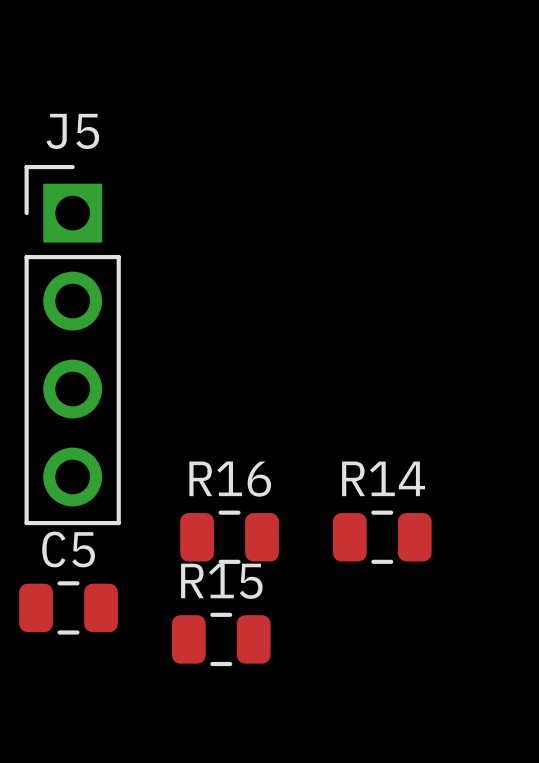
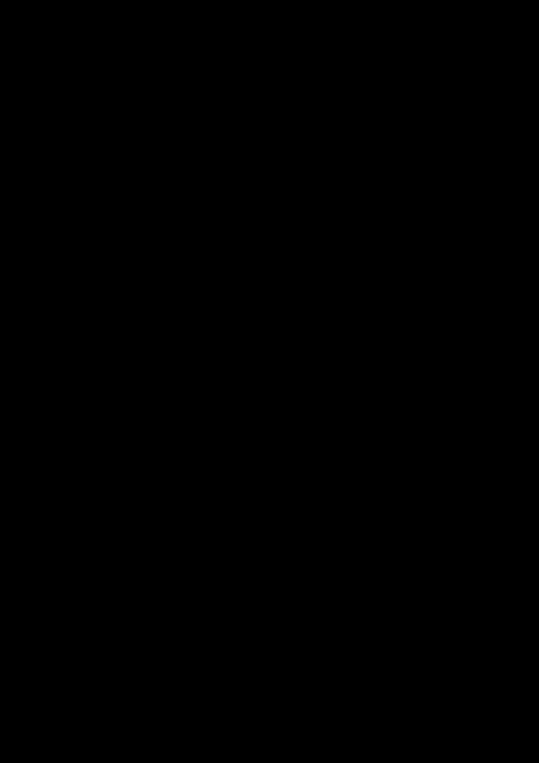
J5: (72, 345) -> none
R16: (229, 537) -> none
R14: (382, 537) -> none
C5: (68, 607) -> none
R15: (221, 639) -> none

